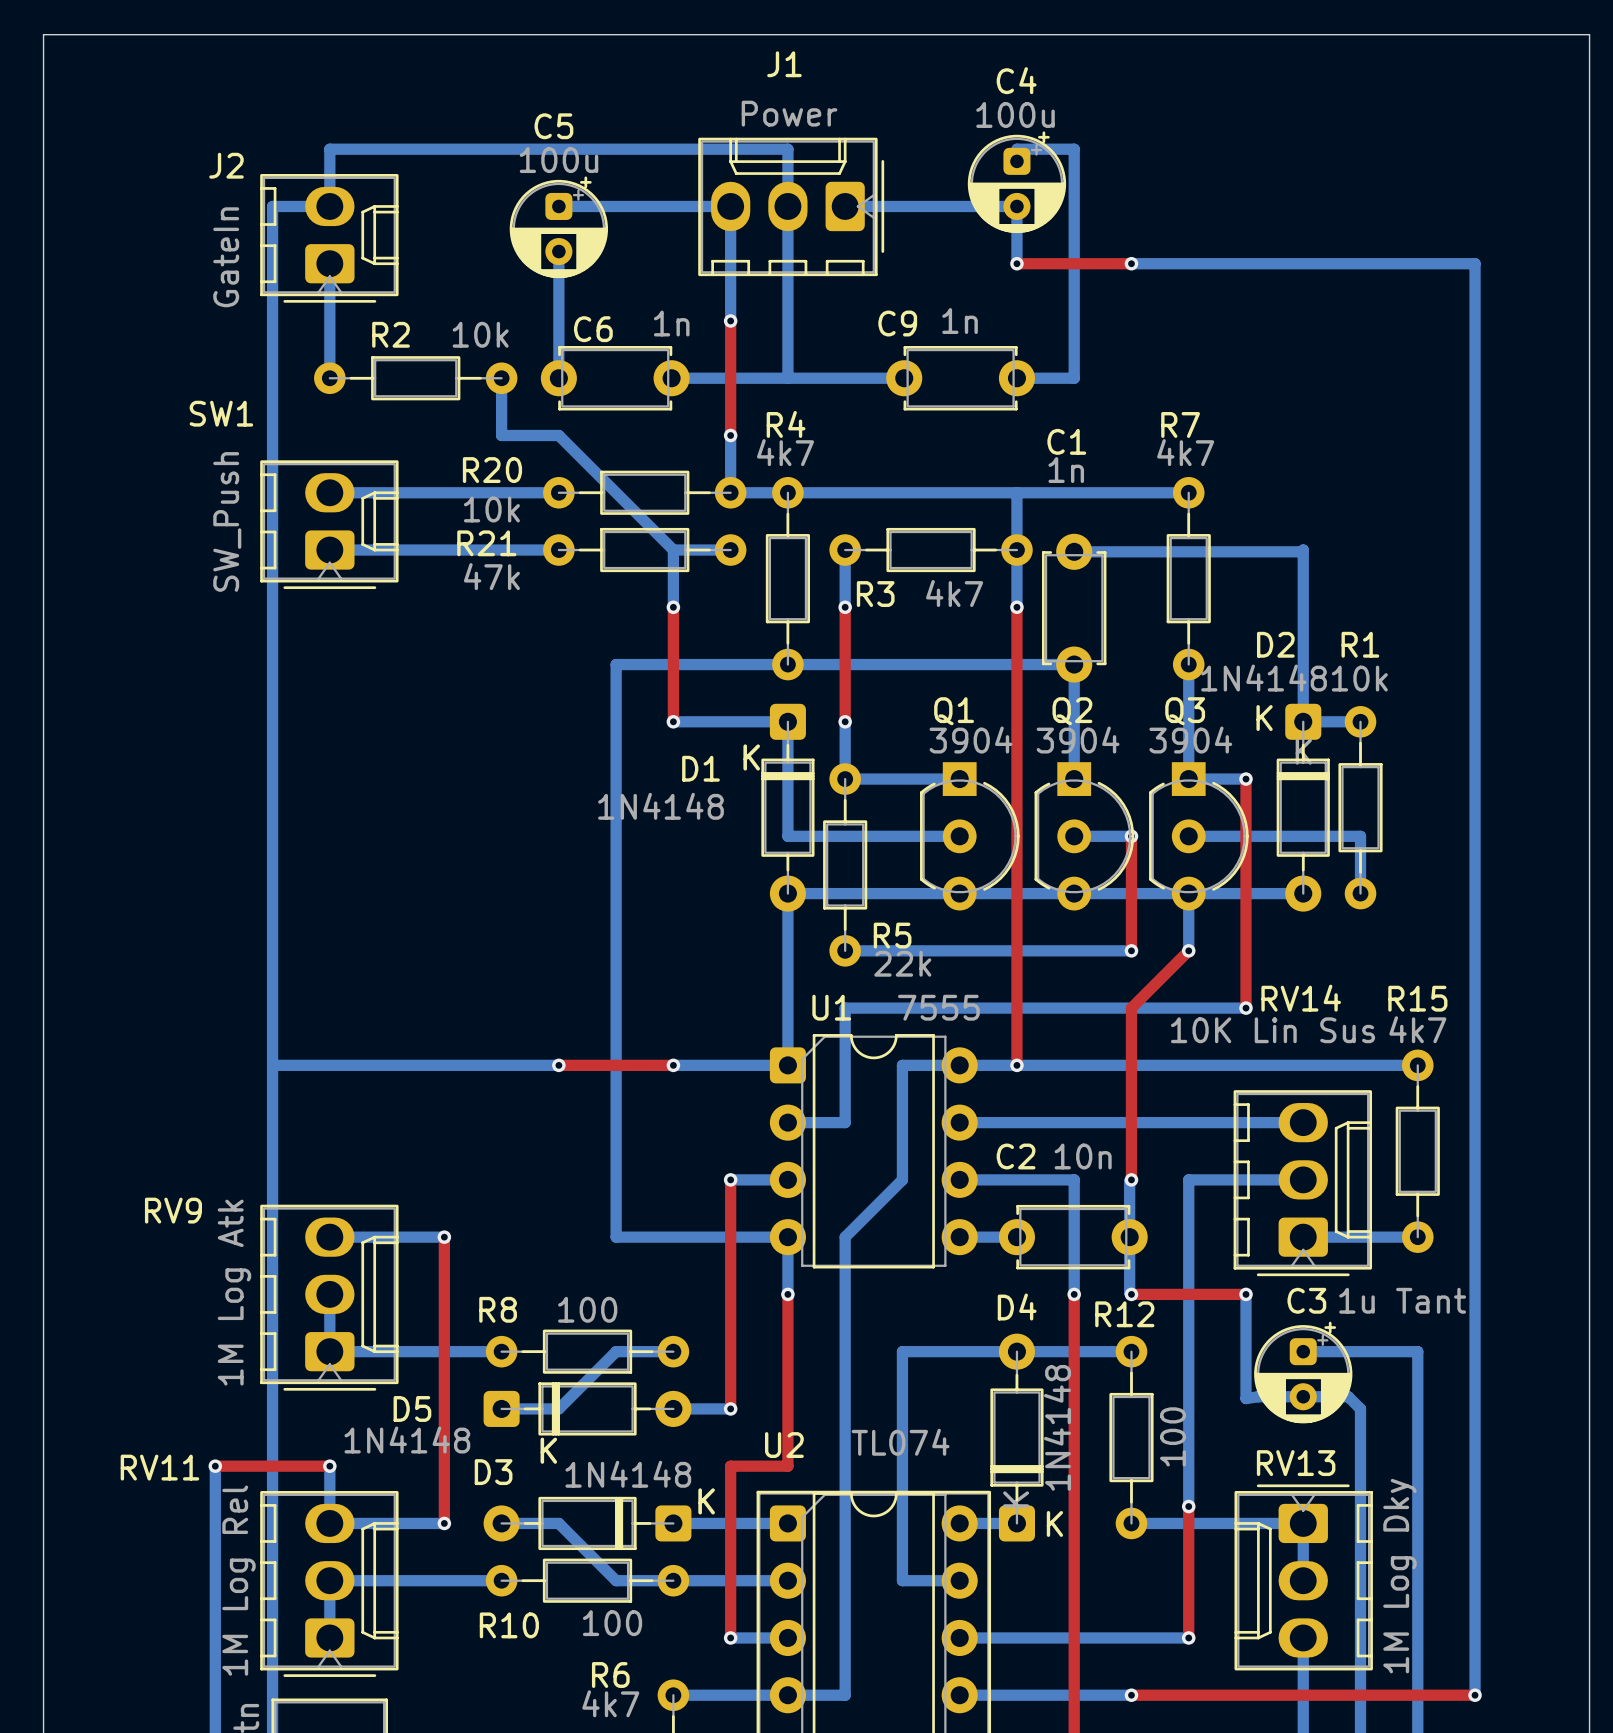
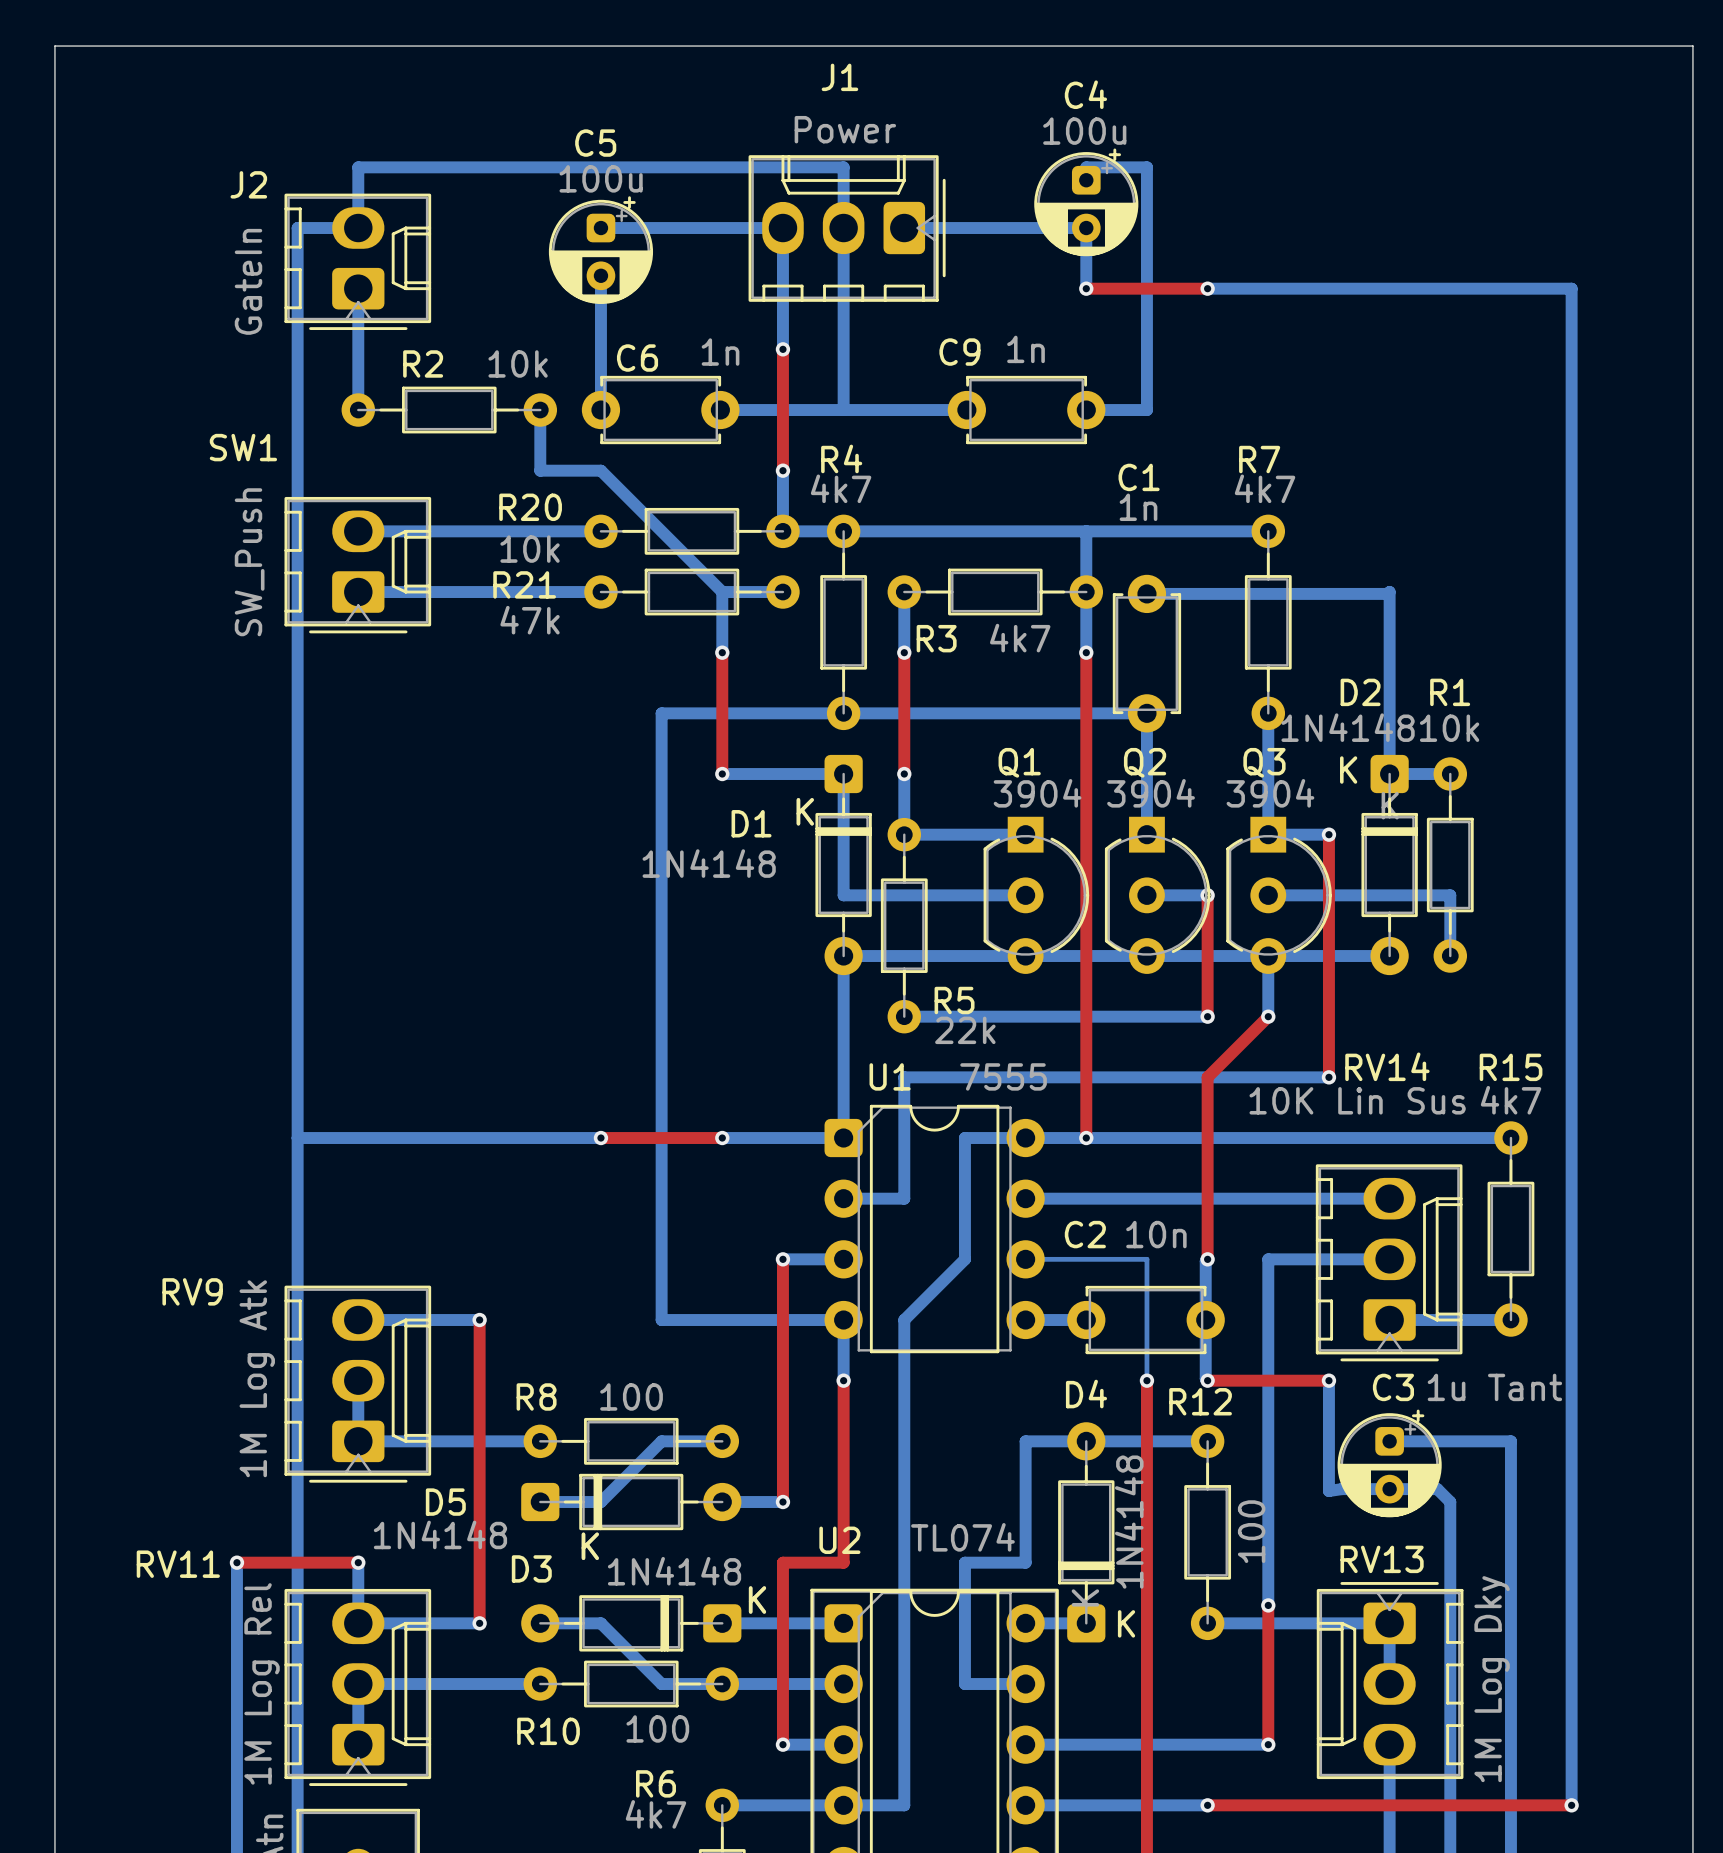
bottom track width: thick (959, 1179) (1074, 1179) (1074, 1294) -> thin (1025, 1259) (1146, 1259) (1146, 1380)
bottom track: (959, 1351) (902, 1351) (902, 1466) -> (1025, 1441) (1025, 1562) (964, 1562)

